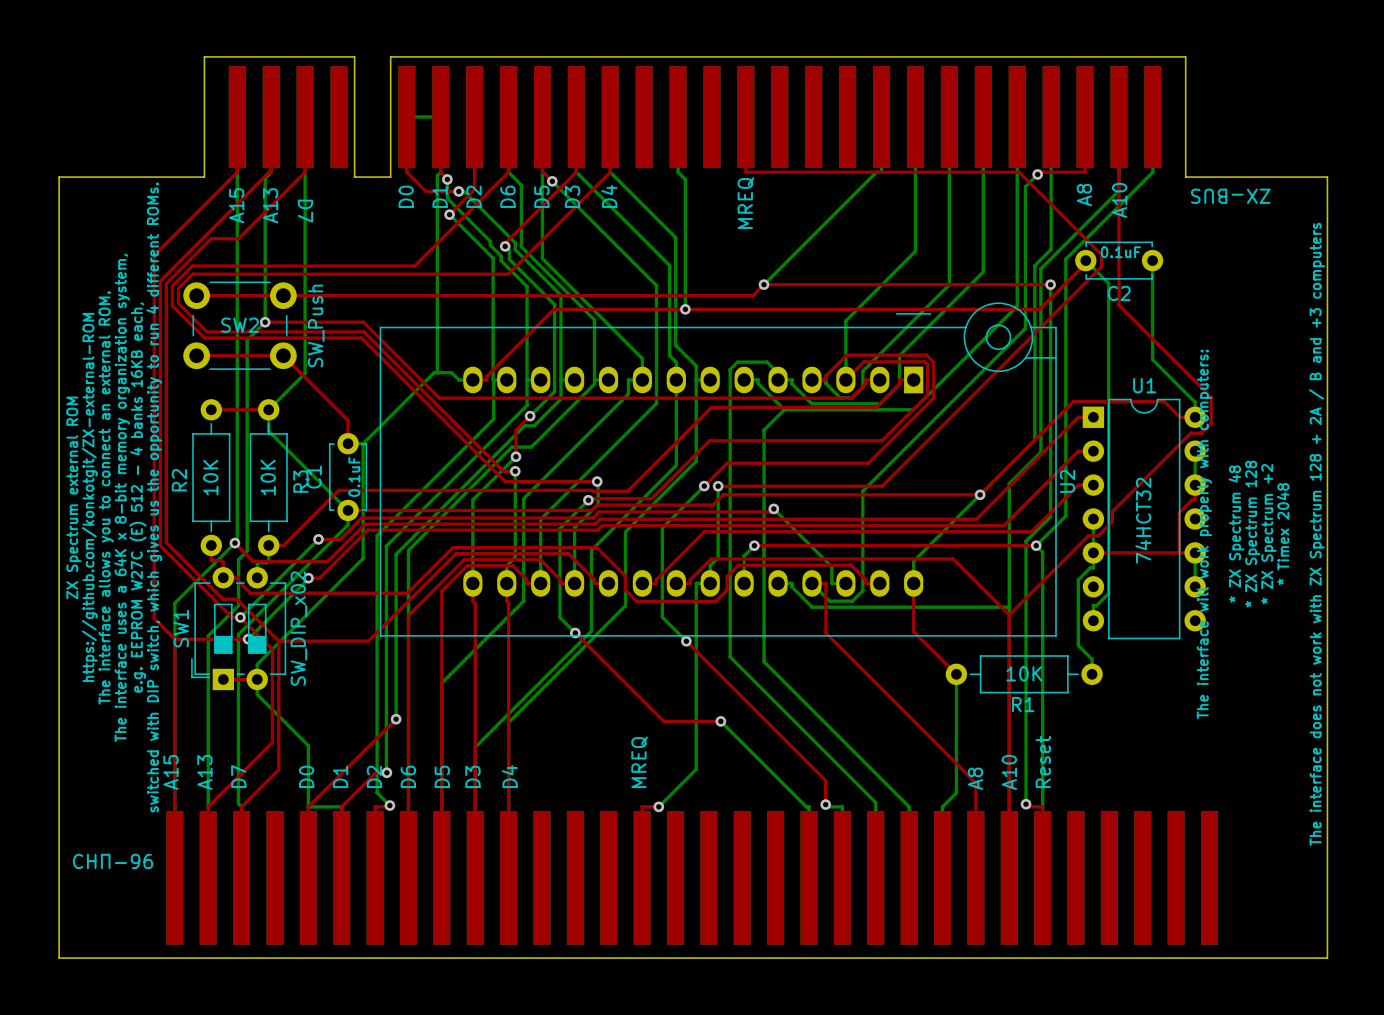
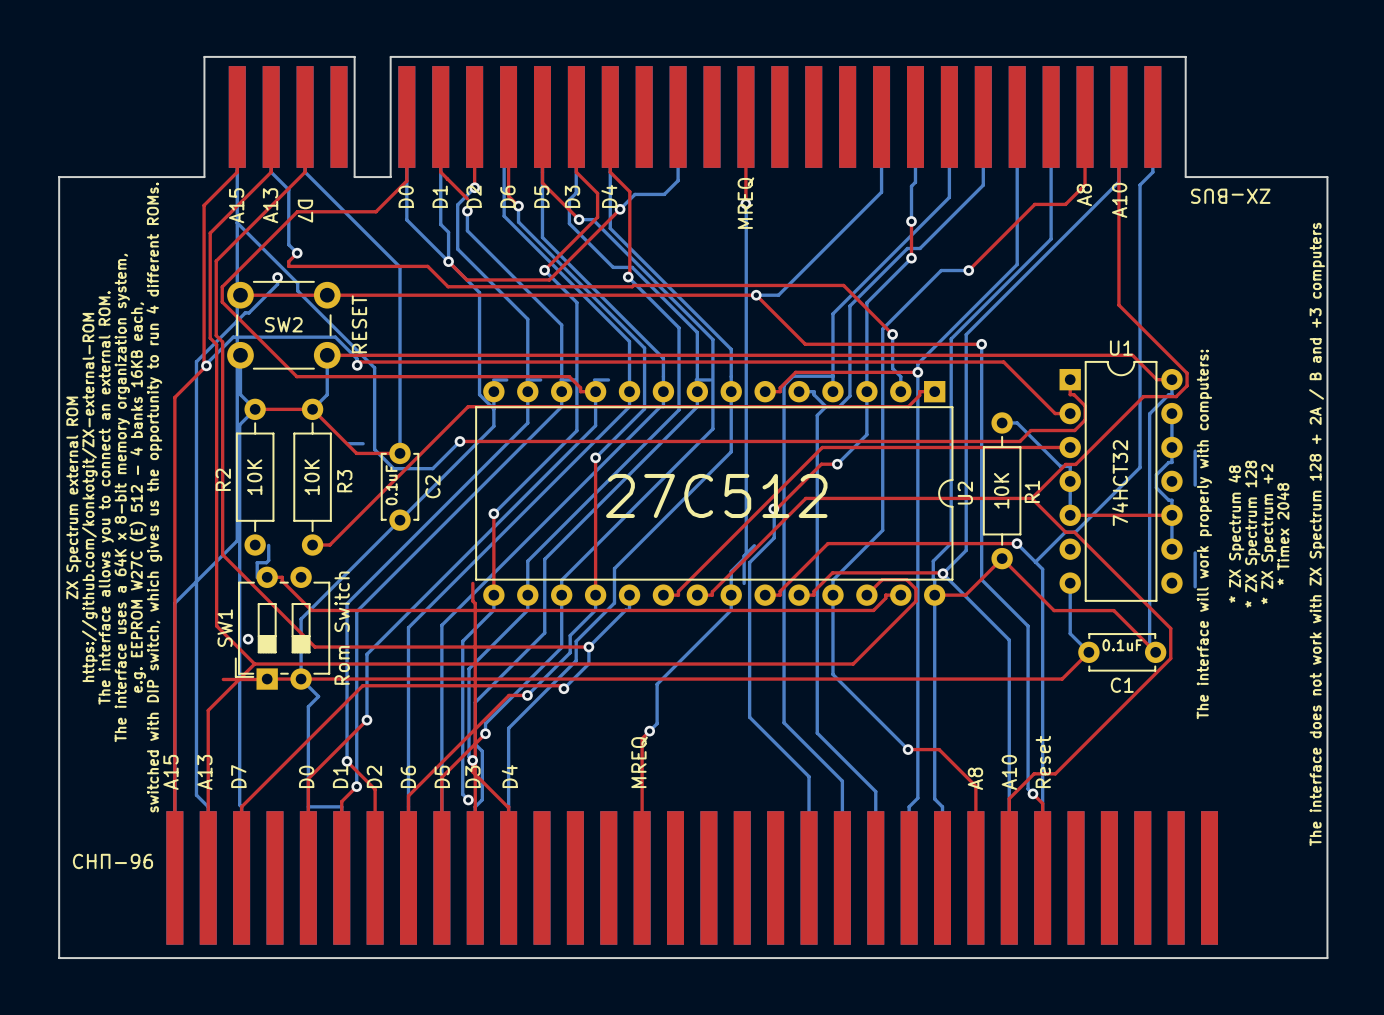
bottom track: (406, 116) (440, 116) -> (406, 116) (406, 219) (479, 292) (479, 394) (493, 409)
bottom track: (508, 116) (508, 172) (521, 185) (521, 246) (594, 319) (594, 384) (531, 447) (511, 447) (408, 550) (408, 627) -> (508, 116) (504, 121) (504, 216) (629, 341) (629, 406) (408, 627)
bottom track: (576, 116) (576, 172) (669, 265) (669, 355) (676, 362) (676, 465) -> (579, 219) (592, 219) (712, 339) (712, 428) (676, 465)
bottom track: none -> (576, 117) (576, 193) (569, 199) (569, 223) (613, 267) (632, 267) (697, 332) (697, 406) (544, 559) (544, 632) (475, 702) (475, 744) (482, 751) (482, 799) (475, 806)
top track: (271, 172) (160, 281) (160, 545) (232, 617) (240, 617) (272, 649) (272, 742) (208, 806) -> (271, 172) (210, 233) (210, 338) (216, 344) (216, 626) (254, 664)
bottom track: (271, 172) (265, 178) (265, 322) (247, 340) (247, 551) (238, 559) (238, 605) (208, 635) (208, 806) -> (277, 277) (277, 284) (249, 312) (245, 312) (196, 361) (196, 795) (208, 806)
bottom track: none -> (271, 172) (288, 189) (288, 244) (297, 253)
bottom track: (305, 172) (305, 373) (268, 409) (268, 431) (348, 510) (348, 524) (238, 634) (239, 804) -> (240, 355) (240, 394) (255, 409) (239, 424) (239, 804)
bottom track: none -> (305, 172) (400, 267) (400, 453)
top track: (406, 172) (426, 191) (458, 191) -> (406, 172) (406, 180) (375, 211) (297, 211) (222, 286) (222, 302) (296, 376) (569, 376) (580, 387) (580, 391) (595, 391)
bottom track: (440, 172) (437, 175) (437, 372) -> (440, 172) (440, 224) (448, 232) (448, 261)
top track: (508, 172) (414, 266) (192, 266) (172, 286) (172, 305) (204, 338) (361, 338) (505, 481) (597, 481) -> (508, 172) (508, 196) (518, 206)
top track: (542, 172) (552, 181) -> (542, 172) (542, 183) (579, 219)
top track: (576, 172) (505, 243) (505, 246) -> (576, 172) (597, 193) (597, 217) (544, 270)
top track: (610, 172) (508, 274) (192, 274) (178, 288) (178, 303) (207, 331) (364, 331) (503, 471) (515, 471) -> (610, 172) (629, 191) (629, 275) (628, 277)
bottom track: (610, 172) (675, 237) (675, 345) (696, 365) (696, 461) (625, 532) (625, 605) (508, 722) (508, 728) -> (610, 172) (610, 228) (731, 349) (731, 451) (614, 568) (614, 603) (576, 641) (576, 660) (508, 728)
bottom track: (678, 172) (685, 179) (685, 309) -> (678, 172) (678, 180) (664, 194) (635, 194) (620, 209)
top track: (745, 172) (1019, 172) (1101, 254) (1101, 266) (882, 486) (718, 486) -> (745, 172) (745, 203)
bottom track: (881, 172) (876, 172) (763, 284) -> (881, 172) (881, 192) (778, 295) (756, 295)
top track: (1085, 172) (1039, 172) (1037, 174) -> (1085, 172) (1085, 184) (1065, 204) (1034, 204) (968, 270)
bottom track: (1037, 174) (1025, 186) (1025, 328) (862, 491) (862, 590) (852, 601) (829, 601) (811, 583) -> none
via: (1037, 174) -> none
bottom track: (447, 179) (447, 198) (490, 241) (490, 245) (501, 256) (501, 260) (527, 286) (527, 405) (386, 546) (386, 772) -> none
via: (447, 179) -> none
bottom track: (552, 181) (656, 285) (656, 403) (540, 519) (540, 583) -> none
via: (552, 181) -> none
bottom track: (1118, 181) (1118, 190) (1040, 268) (1040, 452) (1009, 483) (1009, 640) -> (1118, 181) (966, 334) (966, 550) (942, 573) (1009, 640)
bottom track: (915, 182) (915, 251) (845, 320) (845, 379) -> (915, 182) (911, 186) (911, 221)
bottom track: (983, 185) (983, 271) (899, 355) (899, 384) (880, 403) (811, 403) (792, 383) (792, 379) (778, 379) -> (983, 185) (920, 248) (907, 248) (849, 306) (849, 396) (839, 406) (825, 406)
bottom track: (1140, 185) (1065, 259) (1065, 516) (1036, 545) (1042, 552) (1042, 569) -> (1140, 185) (1140, 467) (1075, 532) (1065, 532) (1035, 562)
top track: (474, 187) (449, 214) -> none
bottom track: none -> (474, 187) (457, 204) (457, 249) (527, 319) (527, 422) (347, 603) (347, 761)
via: none -> (474, 187)
bottom track: (458, 191) (463, 191) (515, 242) (515, 249) (560, 295) (560, 398) (534, 425) (524, 425) (396, 554) (396, 719) -> none
via: (458, 191) -> none
bottom track: (949, 197) (949, 284) (862, 371) (862, 387) (852, 397) (840, 397) (825, 383) (825, 379) (811, 379) -> (949, 197) (832, 313) (832, 391)
bottom track: none -> (745, 203) (746, 556) (731, 571) (731, 610) (657, 684) (657, 723) (649, 731)
via: none -> (745, 203)
top track: (204, 205) (154, 255) (154, 618) (174, 639) (248, 639) -> (204, 205) (204, 363) (206, 365) (174, 397) (174, 639)
bottom track: none -> (518, 206) (518, 222) (644, 348) (644, 408) (595, 457)
via: none -> (518, 206)
top track: none -> (620, 209) (549, 279) (466, 279) (448, 261)
via: none -> (620, 209)
bottom track: none -> (467, 211) (467, 230) (561, 325) (561, 406) (356, 611) (356, 786)
via: none -> (467, 211)
bottom track: (449, 214) (493, 258) (493, 419) (377, 535) (377, 792) (389, 805) -> none
via: (449, 214) -> none
via: none -> (579, 219)
top track: none -> (911, 221) (911, 258)
via: none -> (911, 221)
bottom track: none -> (237, 222) (297, 283) (297, 290) (374, 367) (374, 449) (393, 468) (432, 468) (459, 441)
bottom track: (542, 237) (542, 258) (642, 358) (642, 379) (628, 379) (628, 393) (523, 498) (523, 601) (441, 682) -> (542, 237) (663, 358) (663, 406) (660, 406) (441, 625) (441, 682)
top track: (238, 238) (211, 238) (166, 283) (166, 542) (222, 599) (236, 599) (278, 641) -> (238, 238) (216, 261) (216, 335) (222, 342) (222, 554) (314, 647) (588, 647)
bottom track: (1051, 239) (1051, 249) (1034, 265) (1034, 440) (913, 561) (913, 583) -> (1051, 239) (951, 339) (951, 543) (933, 561) (934, 799) (942, 806)
bottom track: (505, 246) (509, 250) (509, 259) (554, 304) (554, 391) (530, 416) -> none
via: (505, 246) -> none
top track: none -> (297, 253) (288, 261) (288, 266) (427, 266) (448, 286) (843, 285) (892, 334)
via: none -> (297, 253)
bottom track: none -> (911, 258) (866, 302) (866, 434) (837, 464)
via: none -> (911, 258)
top track: (1085, 260) (1085, 263) (1039, 309) (553, 309) (486, 376) (486, 379) (472, 379) -> none
bottom track: (1085, 260) (1108, 283) (1108, 593) (1096, 605) (1093, 605) (1093, 620) -> none
C2 rotation: 0° (1119, 260) -> 90° clockwise (400, 486)
C2 position: (1119, 260) -> (400, 486)
bottom track: (1152, 260) (1152, 359) (1195, 402) (1195, 417) -> none
via: none -> (448, 261)
bottom track: (1017, 264) (1017, 306) (913, 409) (784, 409) -> none
bottom track: none -> (544, 270) (576, 302) (576, 430) (493, 513)
via: none -> (544, 270)
bottom track: none -> (968, 270) (941, 270) (882, 329) (882, 530) (832, 580) (832, 674) (908, 749)
via: none -> (968, 270)
via: none -> (277, 277)
bottom track: none -> (628, 277) (679, 327) (679, 409) (527, 561) (527, 610) (469, 668) (469, 756) (472, 760)
via: none -> (628, 277)
via position: (763, 284) -> (756, 295)
top track: (1050, 284) (763, 284) (752, 295) (196, 295) -> none
bottom track: (1050, 284) (1050, 516) (1026, 541) (1026, 804) -> none
via: (1050, 284) -> none
C2 name position: C2 (1119, 293) -> C2 (432, 486)
top track: none -> (240, 295) (756, 295) (805, 344) (981, 344)
U2 footprint: [379, 302, 1057, 637] -> [475, 380, 954, 606]
via: (685, 309) -> none
top track: (265, 322) (363, 322) (439, 398) (851, 398) (865, 383) (865, 379) (879, 379) -> none
via: (265, 322) -> none
SW2 position: (240, 325) -> (283, 325)
SW2 value: SW_Push (316, 326) -> RESET (359, 324)
bottom track: none -> (892, 334) (892, 368) (900, 376) (900, 391)
via: none -> (892, 334)
bottom track: none -> (981, 344) (981, 579) (1028, 626) (1028, 788) (1032, 793)
via: none -> (981, 344)
top track: (196, 355) (283, 355) (348, 420) (348, 443) -> none
top track: none -> (327, 355) (1132, 355) (1156, 379) (1171, 379)
bottom track: none -> (327, 355) (327, 394) (312, 409)
via: none -> (206, 365)
top track: none -> (357, 365) (360, 362) (1003, 362) (1055, 413) (1070, 413)
bottom track: none -> (357, 365) (357, 358) (335, 337) (233, 337) (206, 365)
via: none -> (357, 365)
top track: none -> (917, 372) (795, 372) (780, 387) (780, 391) (765, 391)
via: none -> (917, 372)
top track: (1187, 373) (1211, 397) (1211, 423) (1201, 433) (1190, 433) (1112, 511) (1112, 521) (1098, 535) (1088, 535) (1009, 615) -> (1187, 373) (1187, 385) (1176, 396) (1143, 396) (1075, 464) (1065, 464) (1031, 498)
bottom track: (472, 379) (458, 379) (451, 372) (434, 372) (363, 443) (363, 558) (257, 664) (257, 694) (308, 745) -> (493, 391) (493, 426) (301, 619) (301, 679) (318, 696) (308, 706) (308, 745)
bottom track: (744, 379) (758, 379) (758, 383) (784, 409) -> none
bottom track: (785, 379) (767, 362) (737, 362) (730, 369) (730, 656) (875, 802) -> (825, 406) (817, 415) (817, 733) (875, 791) (875, 802)
top track: (811, 379) (825, 379) (825, 376) (846, 355) (926, 355) (933, 362) (933, 397) (868, 463) (727, 463) (704, 486) -> none
top track: (845, 379) (863, 361) (924, 361) (927, 364) (927, 395) (882, 440) (709, 440) (651, 498) (588, 500) -> none
top track: (913, 379) (899, 379) (899, 383) (876, 407) (711, 407) (627, 491) (338, 490) (283, 545) (268, 545) -> none
top track: none -> (1070, 379) (1070, 394) (1073, 394) (1085, 405) (1085, 420) (1074, 430) (1030, 430) (1019, 441) (459, 441)
bottom track: none -> (1171, 379) (1171, 394) (1168, 394) (1149, 413) (1149, 646) (1155, 652)
bottom track: none -> (595, 391) (595, 425) (366, 654) (366, 720)
bottom track: none -> (799, 391) (814, 391) (814, 394) (825, 406)
top track: none -> (934, 391) (919, 391) (919, 395) (908, 406) (468, 406) (329, 545) (312, 545)
top track: (211, 409) (268, 409) -> none
top track: none -> (255, 409) (312, 409) (356, 453) (400, 453)
bottom track: (784, 409) (764, 430) (764, 661) (909, 806) -> (1017, 264) (917, 363) (917, 798) (909, 806)
bottom track: none -> (1171, 413) (1171, 462) (1168, 462) (1156, 474) (1156, 487) (1168, 500) (1171, 500) (1171, 549)
top track: (530, 416) (515, 430) (515, 456) -> none
via: (530, 416) -> none
top track: (1093, 417) (1078, 417) (976, 519) (600, 519) (595, 524) (365, 524) (327, 561) (253, 561) (234, 543) -> none
top track: (1195, 417) (1180, 417) (1164, 401) (1073, 401) (980, 494) (723, 494) (713, 505) (597, 505) (591, 510) (348, 510) -> none
bottom track: none -> (1002, 422) (1017, 422) (1060, 466) (1070, 466) (1070, 515)
via: none -> (459, 441)
top track: none -> (1070, 447) (822, 447) (678, 591) (678, 595) (663, 595)
top track: (1093, 451) (1078, 451) (1003, 525) (602, 525) (597, 530) (367, 530) (319, 578) (308, 578) -> none
bottom track: (515, 456) (472, 499) (472, 583) -> none
via: (515, 456) -> none
top track: none -> (595, 457) (595, 595)
via: none -> (595, 457)
top track: none -> (837, 464) (821, 464) (774, 511)
via: none -> (837, 464)
bottom track: (515, 471) (515, 557) (506, 565) (506, 583) -> none
via: (515, 471) -> none
R2 position: (211, 477) -> (255, 477)
R3 position: (268, 477) -> (312, 477)
C1 name position: C1 (314, 477) -> C1 (1122, 685)
C1 rotation: 0° (348, 477) -> 90° clockwise (1122, 652)
C1 position: (348, 477) -> (1122, 652)
bottom track: (597, 481) (598, 504) (574, 527) (574, 583) -> none
via: (597, 481) -> none
U2 name position: U2 (1067, 481) -> U2 (965, 493)
top track: (1093, 485) (1078, 485) (1031, 531) (704, 531) (656, 579) (656, 583) (642, 583) -> none
top track: (1195, 485) (1195, 500) (1192, 500) (1179, 512) (1179, 552) -> none
bottom track: (704, 486) (662, 528) (662, 617) (686, 641) -> none
via: (704, 486) -> none
bottom track: (718, 486) (718, 557) (710, 565) (710, 583) (696, 583) (696, 769) (658, 806) -> none
via: (718, 486) -> none
via: (980, 494) -> none
U2 value: none -> 27C512 (716, 495)
top track: none -> (1031, 498) (805, 498) (712, 591) (712, 595) (697, 595)
bottom track: (588, 500) (559, 528) (559, 617) (575, 633) -> none
via: (588, 500) -> none
top track: (773, 508) (770, 512) (598, 512) (592, 518) (361, 518) (340, 539) (318, 539) -> none
bottom track: (773, 508) (831, 566) (831, 583) (845, 583) -> none
top track: none -> (493, 513) (493, 595)
via: none -> (493, 513)
bottom track: (1093, 518) (1093, 567) (1090, 567) (1078, 579) (1078, 645) (1092, 659) (1092, 674) -> none
U1 position: (1144, 518) -> (1121, 481)
bottom track: (318, 539) (240, 617) -> none
via: (318, 539) -> none
via: (234, 543) -> none
top track: none -> (1017, 543) (827, 543) (780, 591) (780, 595) (765, 595)
bottom track: none -> (1017, 543) (1035, 562)
top track: (211, 545) (211, 560) (221, 560) (223, 562) (223, 577) (238, 577) (238, 581) (250, 593) (407, 593) (453, 547) (596, 547) (625, 576) (625, 590) (636, 601) (715, 601) (727, 590) (727, 576) (738, 565) (851, 565) (865, 579) (865, 583) (879, 583) -> none
top track: (754, 545) (1036, 545) -> none
via: (754, 545) -> none
via position: (1036, 545) -> (1017, 543)
bottom track: (591, 550) (591, 631) (475, 747) (475, 806) -> (591, 550) (561, 580) (561, 647) (485, 723) (485, 733)
top track: (1093, 552) (1195, 552) -> (1070, 515) (1171, 515)
bottom track: none -> (1035, 562) (1042, 569)
top track: none -> (942, 573) (832, 572) (814, 591) (814, 595) (799, 595)
via: none -> (942, 573)
top track: none -> (267, 577) (282, 577) (282, 581) (311, 610) (873, 610) (885, 598) (885, 595) (900, 595)
bottom track: (308, 578) (248, 639) -> none
via: (308, 578) -> none
top track: (506, 583) (506, 601) (508, 603) (508, 806) -> (472, 760) (472, 771) (508, 806)
top track: (540, 583) (526, 583) (526, 579) (512, 565) (467, 565) (441, 590) (441, 777) -> (485, 733) (441, 777)
top track: (574, 583) (560, 583) (560, 579) (540, 559) (464, 559) (408, 615) (408, 795) -> (527, 695) (509, 695) (408, 795)
top track: (608, 583) (594, 583) (594, 579) (568, 553) (456, 553) (368, 641) (278, 641) -> none
top track: (676, 583) (690, 583) (690, 579) (711, 558) (953, 558) (1009, 615) -> none
bottom track: (778, 583) (792, 583) (792, 586) (812, 607) (1009, 607) -> none
top track: (811, 583) (825, 583) (825, 633) (975, 783) (975, 786) -> (908, 749) (939, 749) (975, 786)
top track: (913, 583) (913, 631) (956, 674) -> none
bottom track: none -> (1070, 583) (1070, 633) (1088, 652)
bottom track: none -> (493, 595) (493, 610) (462, 641) (462, 794) (468, 799)
bottom track: none -> (595, 595) (595, 610) (570, 635) (570, 652) (527, 695)
bottom track: none -> (629, 595) (629, 610) (625, 610) (588, 647) (588, 663) (563, 688)
top track: none -> (866, 595) (882, 579) (906, 579) (915, 588) (915, 601) (853, 664) (254, 664)
top track: none -> (934, 595) (965, 595) (1002, 558) (1054, 610) (1113, 610) (1155, 652)
top track: (1009, 615) (1009, 798) -> (1031, 498) (1065, 532) (1074, 532) (1170, 628) (1170, 658) (1055, 773) (1034, 773) (1009, 798)
via: (240, 617) -> none
SW1 position: (238, 628) -> (282, 628)
SW1 value: SW_DIP_x02 (298, 628) -> Rom Switch (342, 628)
top track: (575, 633) (663, 721) (720, 721) -> none
via position: (575, 633) -> (588, 647)
top track: (278, 641) (278, 769) -> (563, 688) (560, 685) (362, 685) (278, 769)
top track: (686, 641) (825, 780) (825, 804) -> none
via: (686, 641) -> none
top track: none -> (1088, 652) (1062, 679) (267, 679)
top track: none -> (254, 664) (208, 710) (208, 806)
bottom track: (956, 674) (956, 792) (942, 806) -> none
R1 rotation: 0° (1024, 674) -> 90° clockwise (1002, 490)
R1 position: (1024, 674) -> (1002, 490)
via: none -> (563, 688)
via: none -> (527, 695)
R1 name position: R1 (1023, 704) -> R1 (1032, 491)
top track: (396, 719) (308, 806) -> (366, 720) (308, 778) (308, 806)
via: (396, 719) -> none
via: none -> (366, 720)
bottom track: (720, 721) (806, 806) (809, 806) -> (774, 511) (774, 537) (749, 562) (749, 717) (809, 776) (809, 806)
via: (720, 721) -> none
via: none -> (649, 731)
via: none -> (485, 733)
via: none -> (908, 749)
via: none -> (472, 760)
via: none -> (347, 761)
top track: (386, 772) (375, 772) (341, 806) -> (356, 786) (341, 801) (341, 806)
via: (386, 772) -> none
via: none -> (356, 786)
via: none -> (468, 799)
bottom track: (825, 804) (827, 806) (842, 806) -> (832, 376) (793, 376) (784, 385) (784, 722) (842, 781) (842, 806)
via: (825, 804) -> none
top track: (1026, 804) (1028, 806) (1042, 806) -> (1032, 793) (1042, 803) (1042, 806)
via position: (1026, 804) -> (1032, 793)
top track: (389, 805) (375, 806) -> (347, 761) (375, 789) (375, 806)
via: (389, 805) -> none
top track: (642, 806) (658, 806) -> (642, 806) (642, 738) (649, 731)
via: (658, 806) -> none

